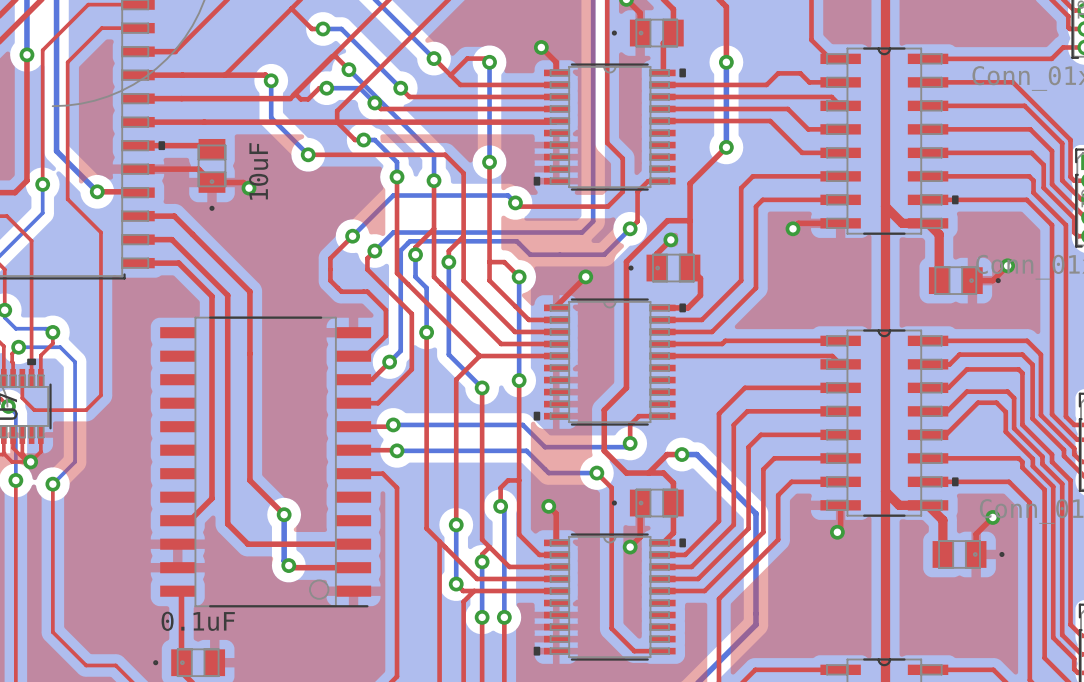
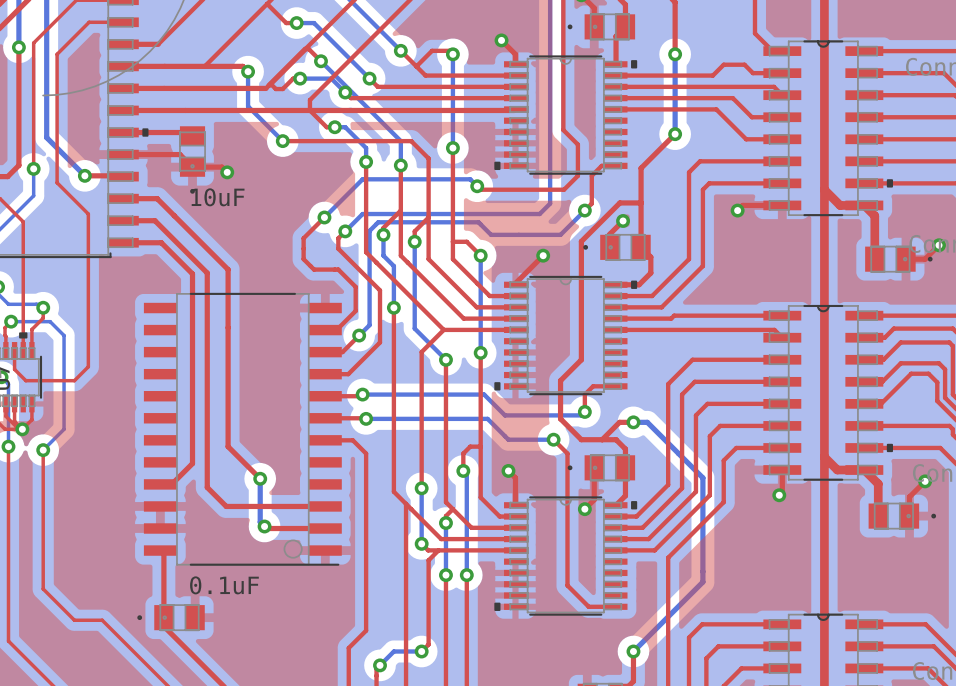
part value rotation: 0° (258, 171) -> 90° clockwise (217, 197)
part value position: 0.1uF (198, 621) -> 0.1uF (224, 585)

